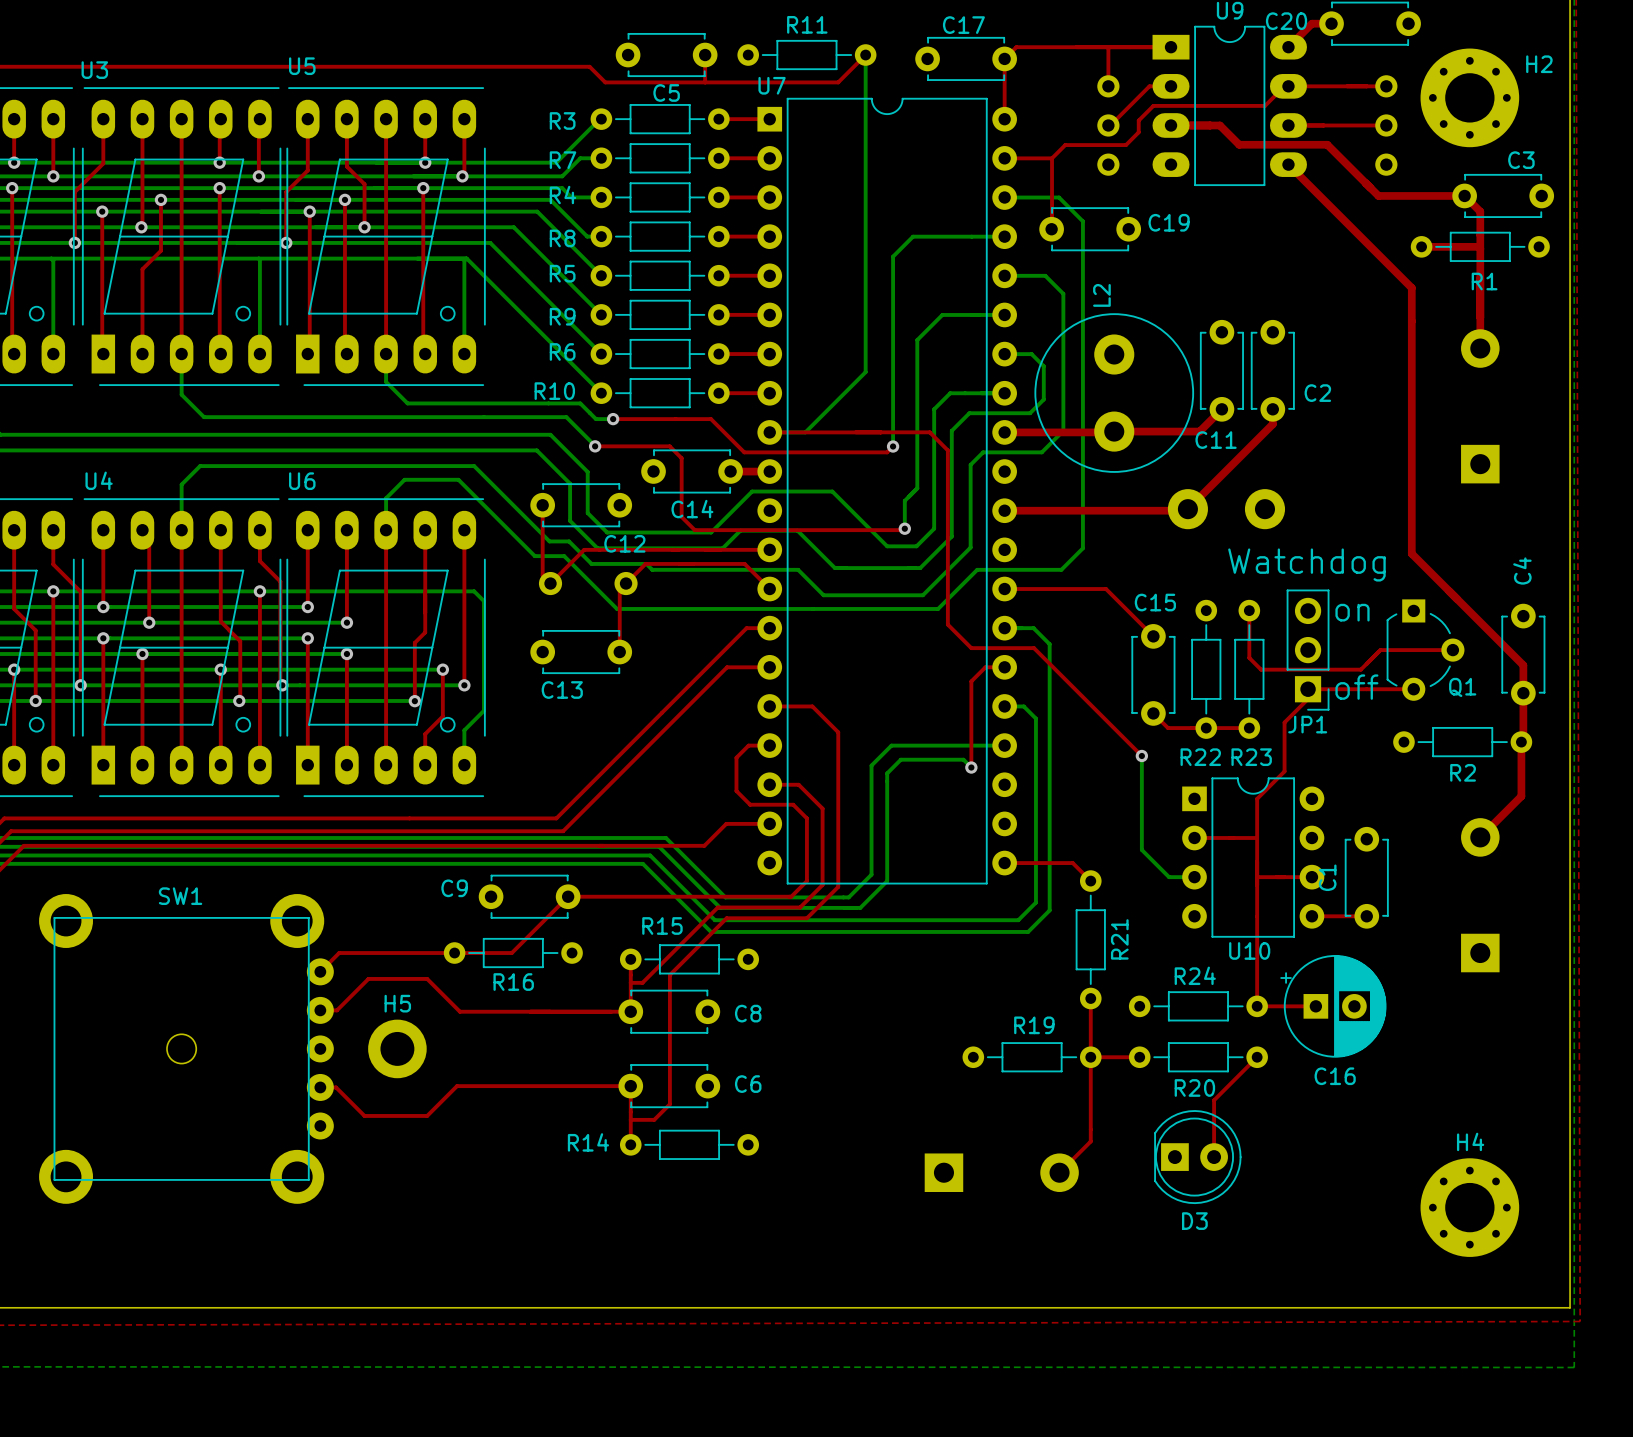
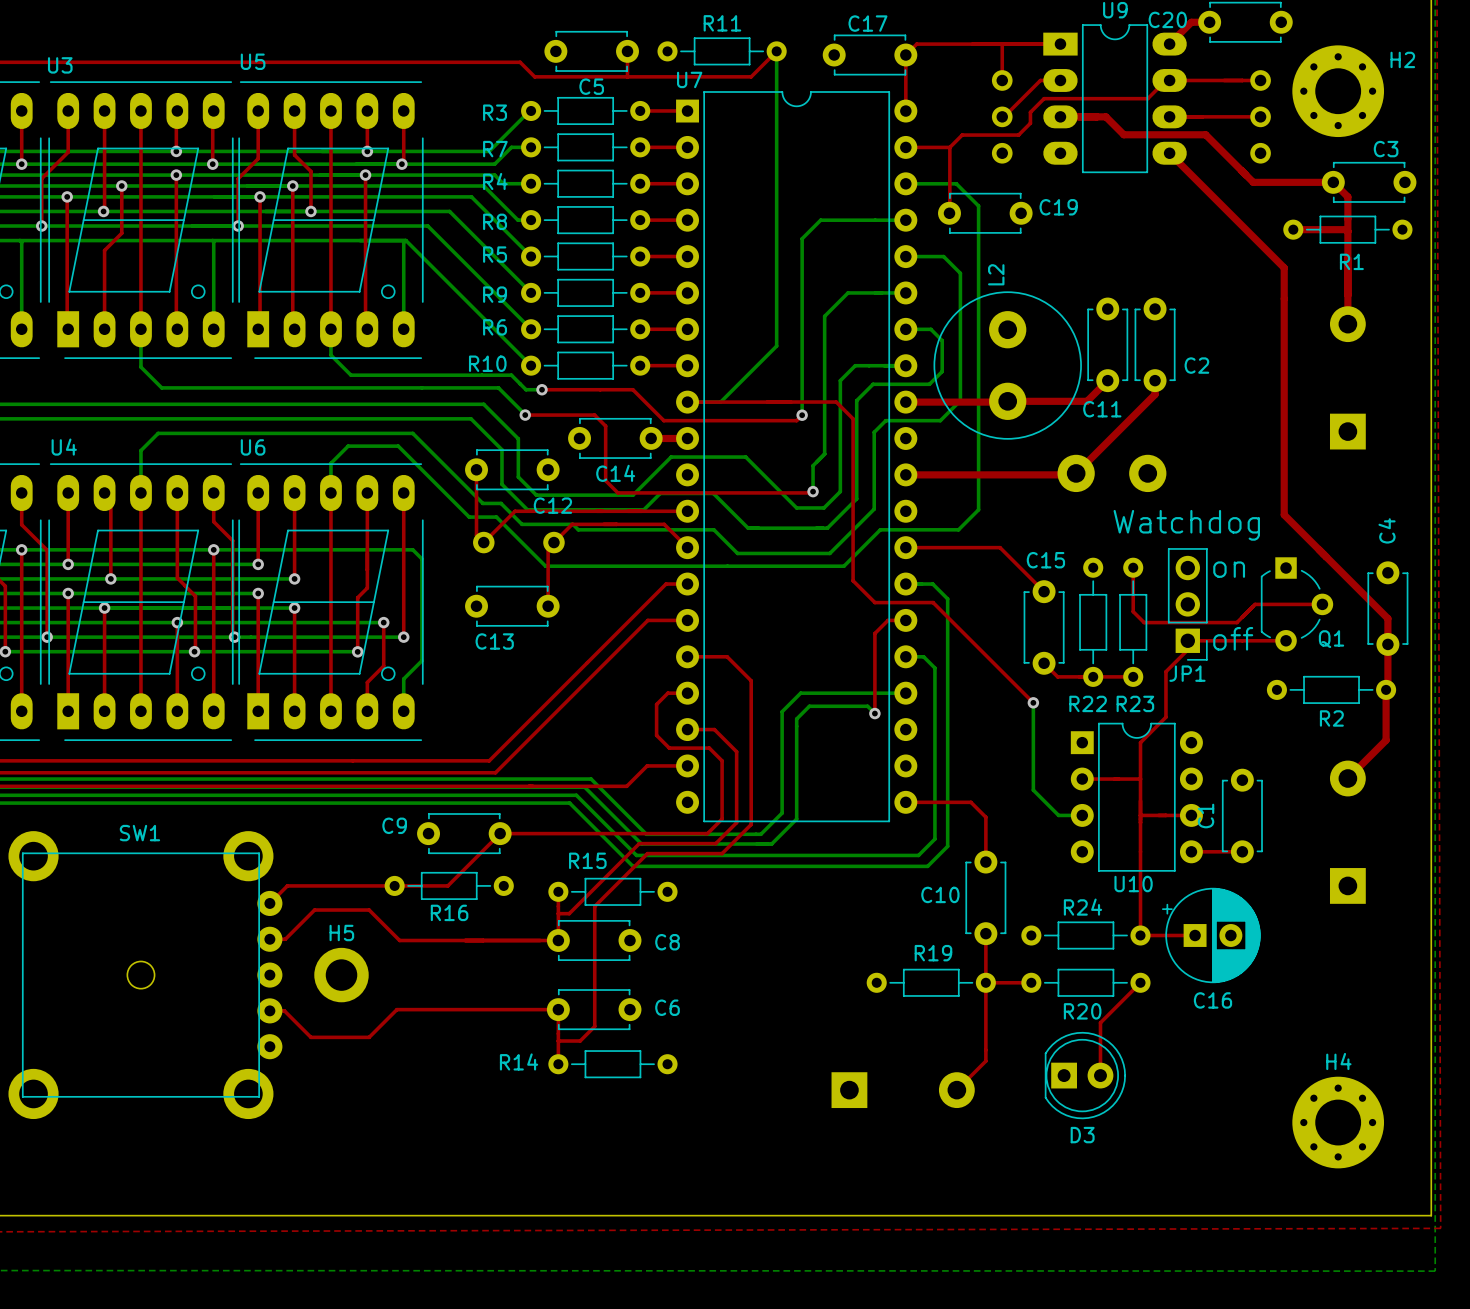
top track: (1072, 863) (1090, 881) -> (969, 802) (985, 817) (985, 862) (987, 860)
R21: (1090, 939) -> none
C10: none -> (985, 897)

